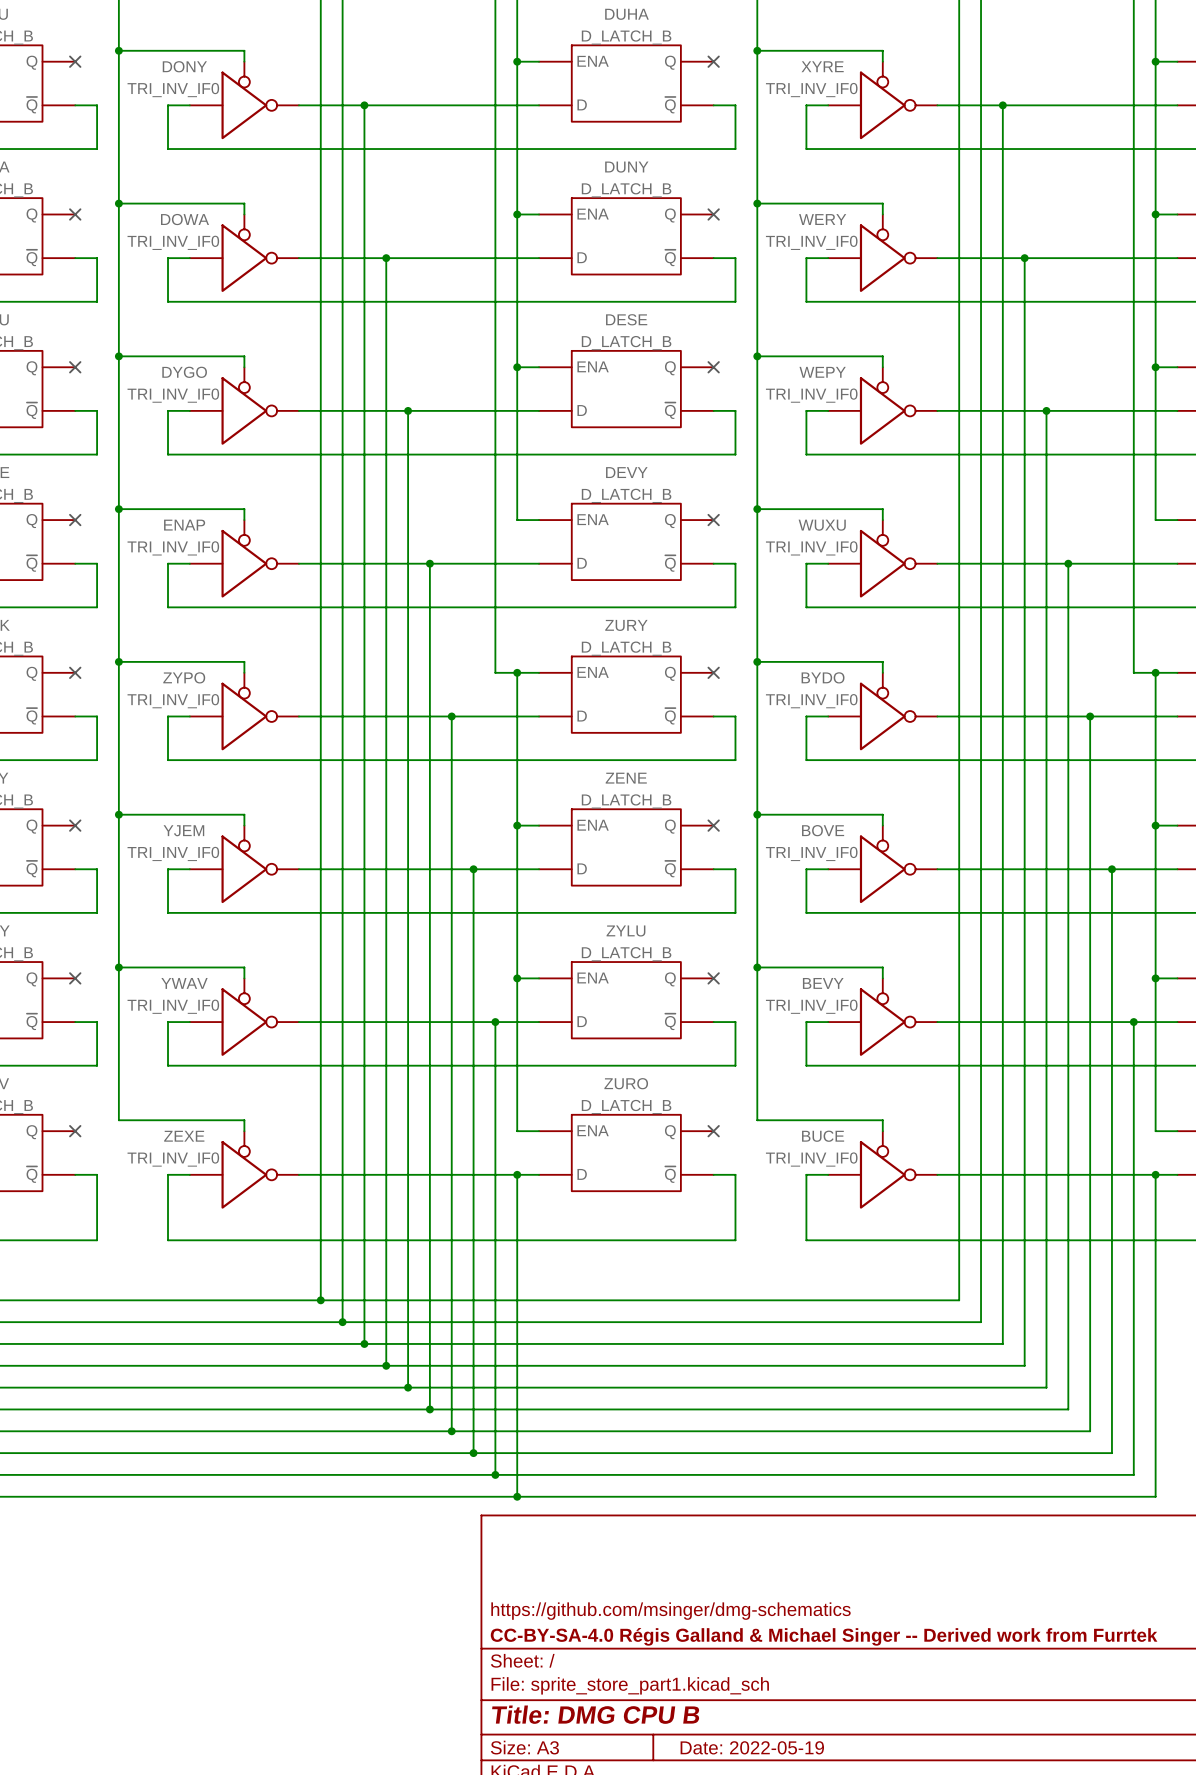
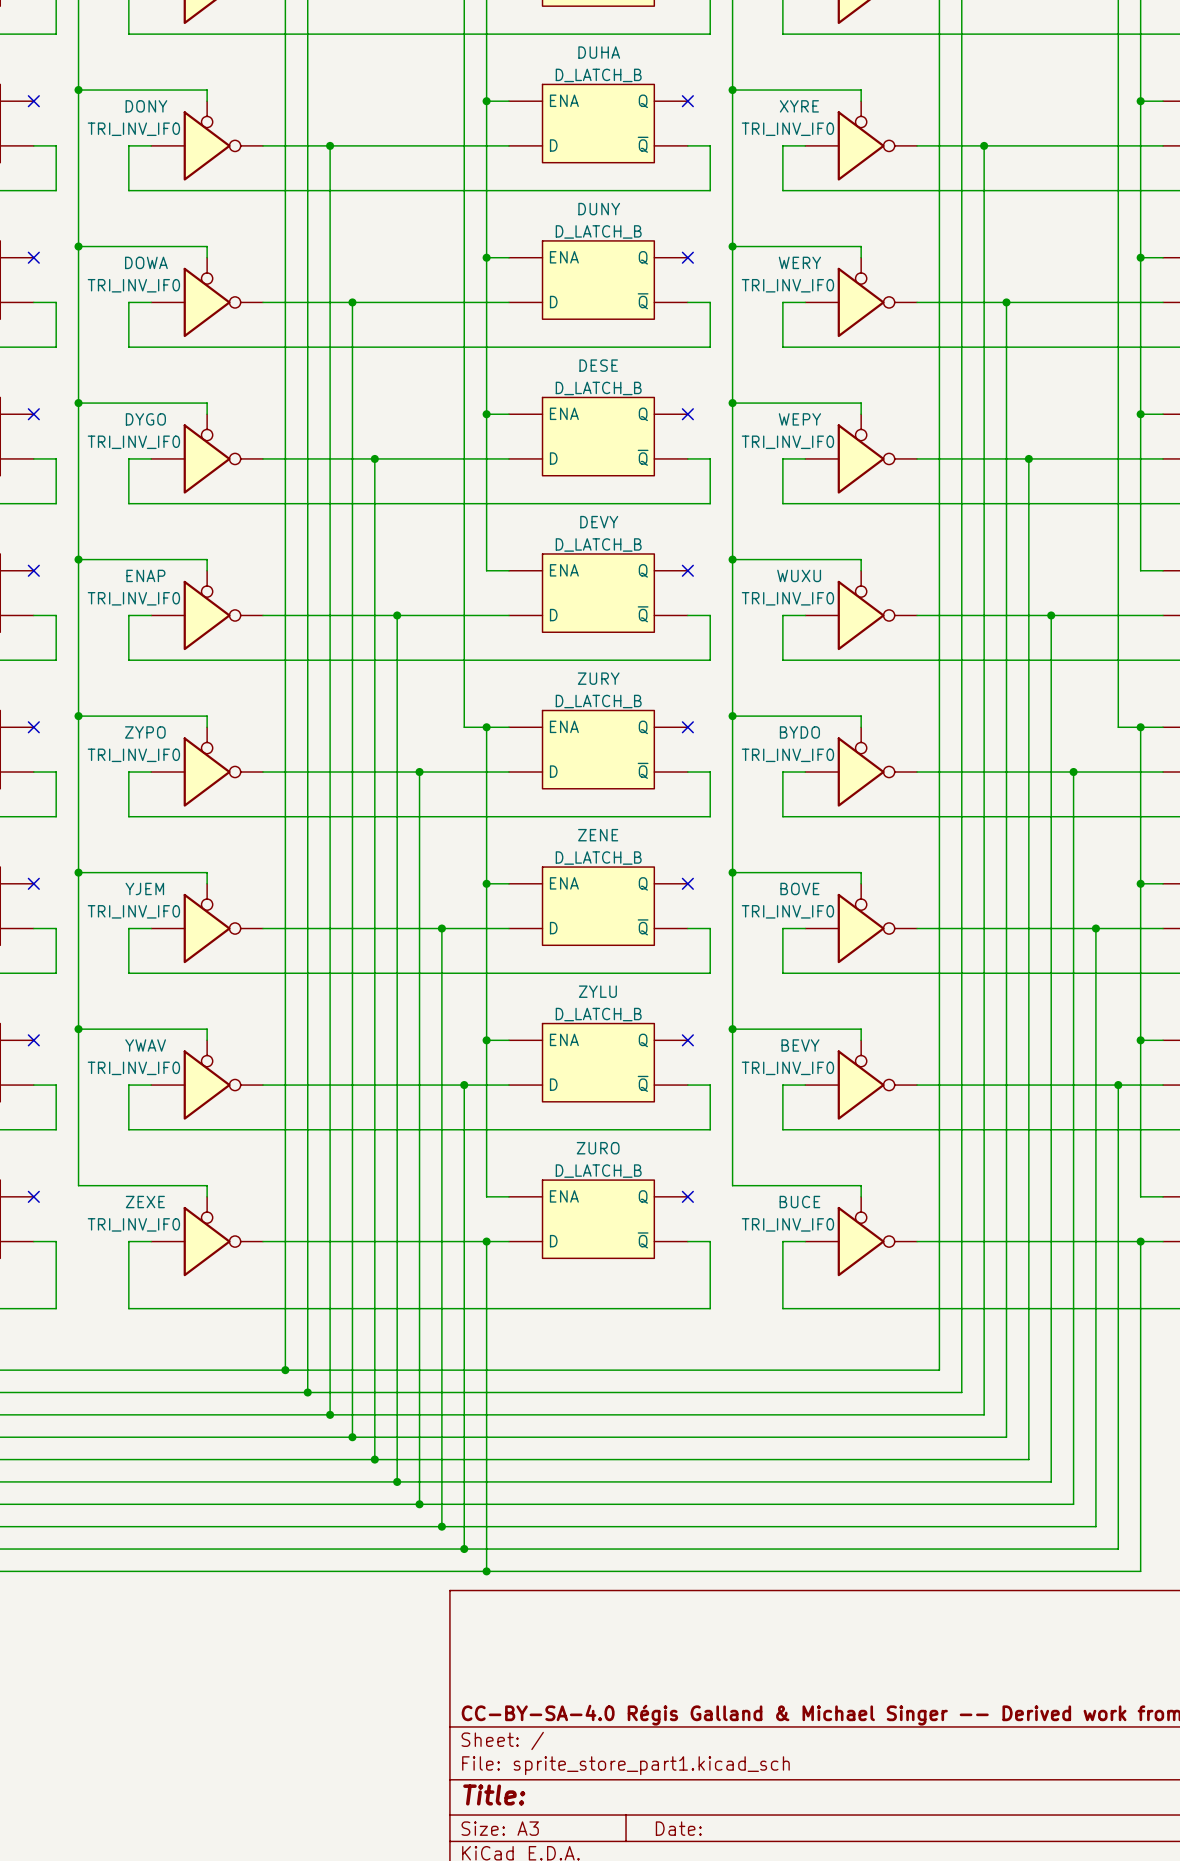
title block: https://github.com/msinger/dmg-schematics (670, 1611) -> none
title block: Title: DMG CPU B (595, 1714) -> Title: (494, 1794)
title block: Date: 2022-05-19 (752, 1747) -> Date: (678, 1828)

